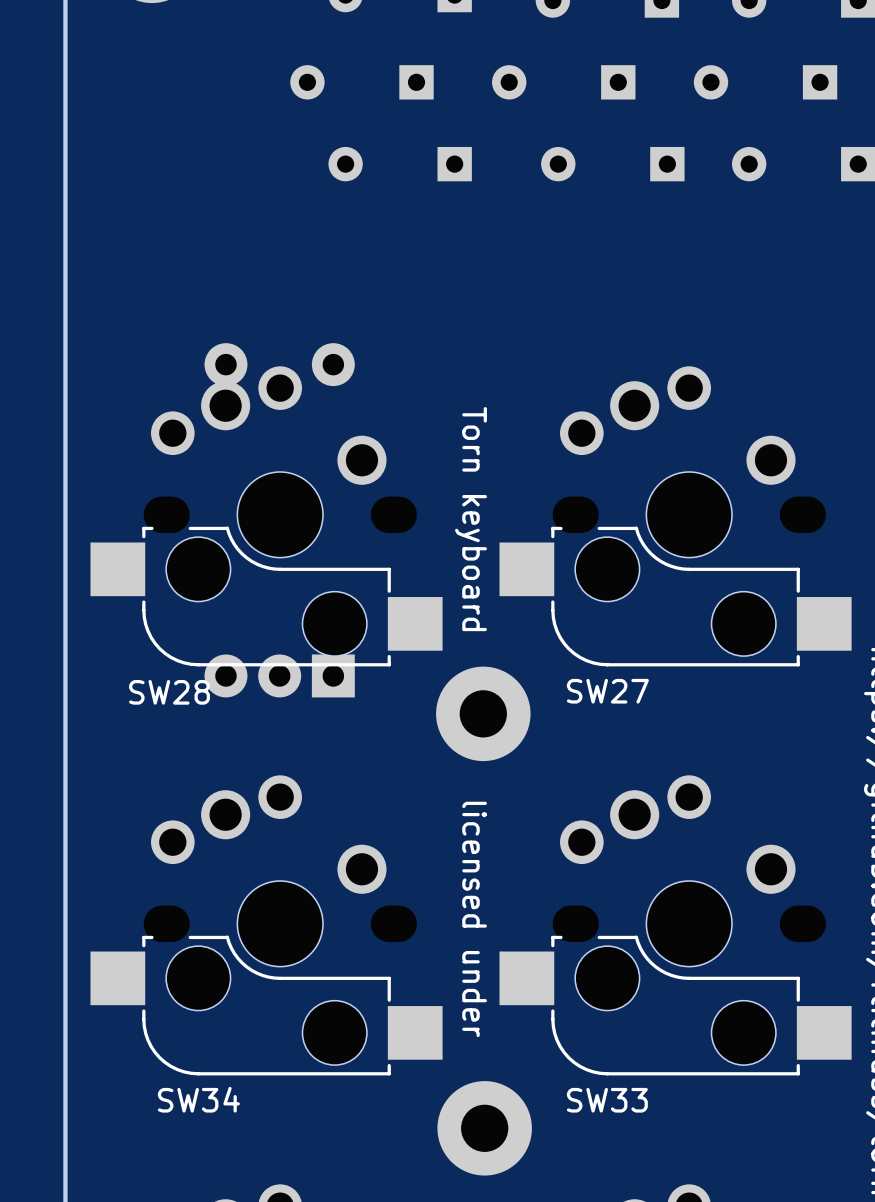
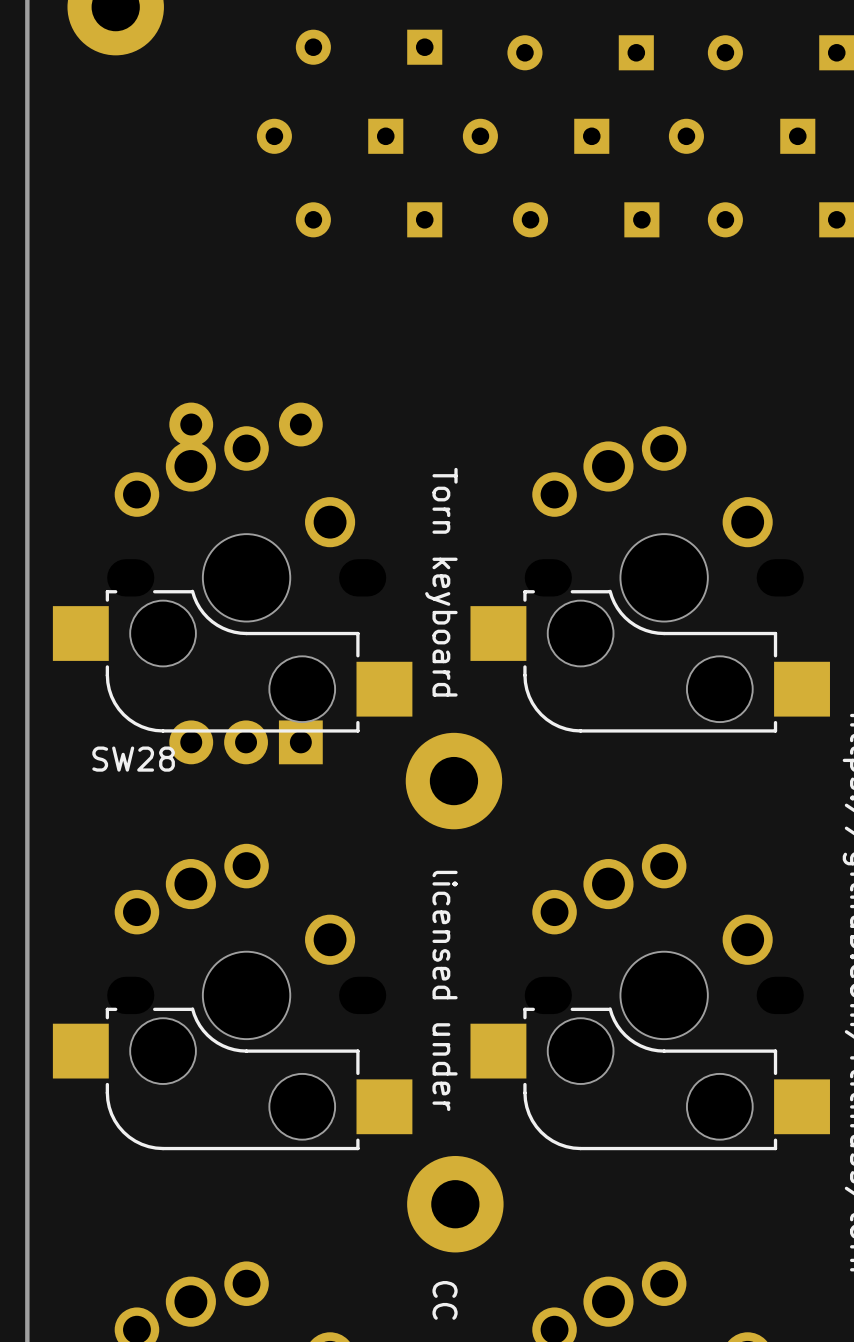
SW27 name: SW27 (607, 691) -> none
SW34 name: SW34 (198, 1099) -> none
SW33 name: SW33 (607, 1100) -> none

